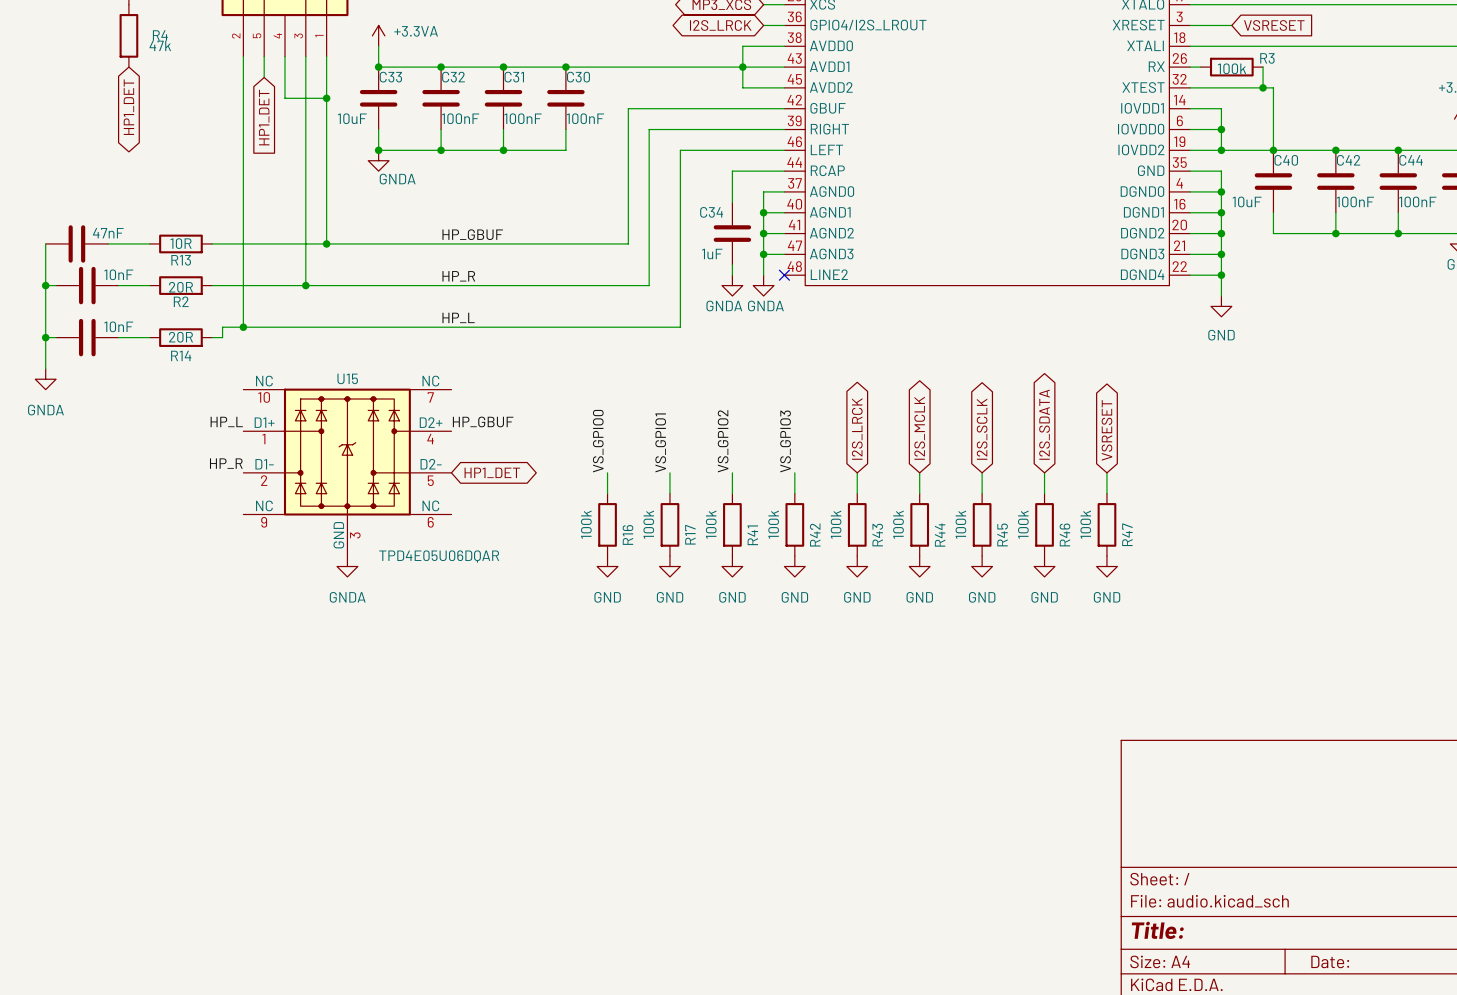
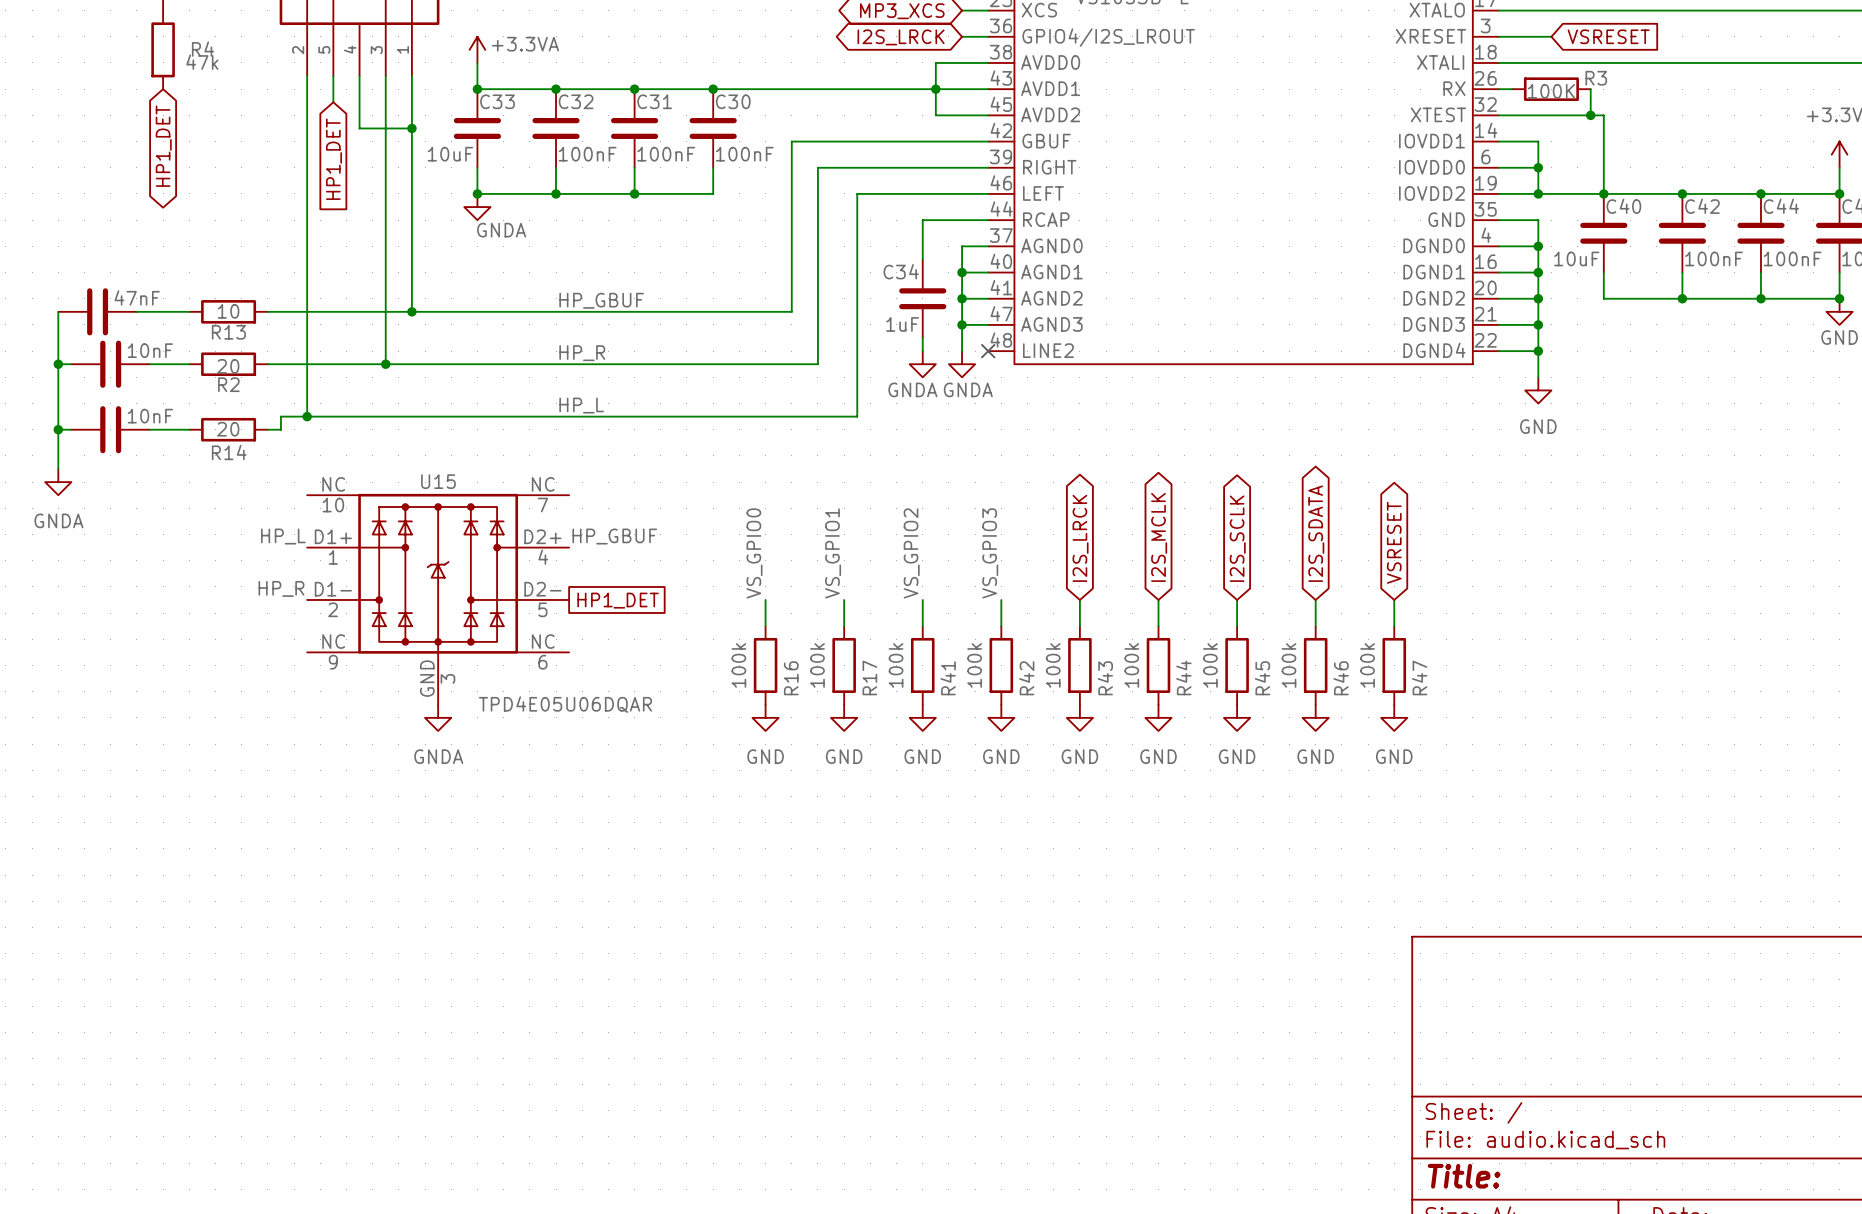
R3 value: 100k (1232, 68) -> 100K (1551, 91)
R13 value: 10R (181, 243) -> 10 (228, 311)
R2 value: 20R (181, 287) -> 20 (228, 366)
R14 value: 20R (181, 337) -> 20 (228, 429)
global label shape: bidirectional (492, 472) -> passive (618, 600)

